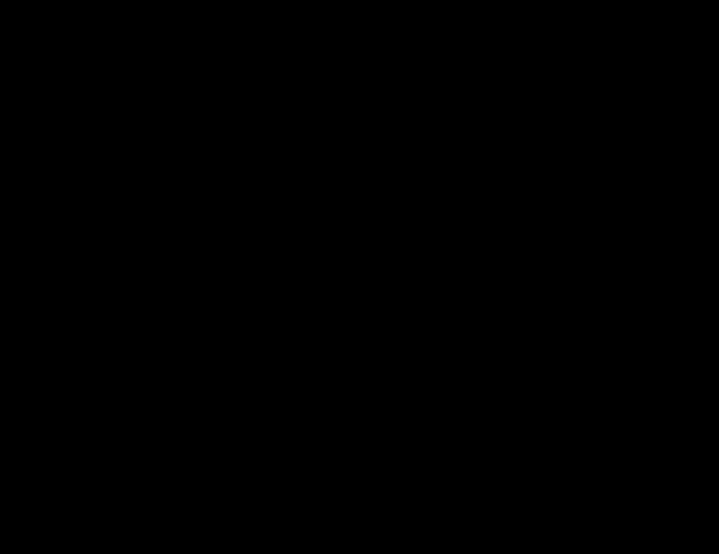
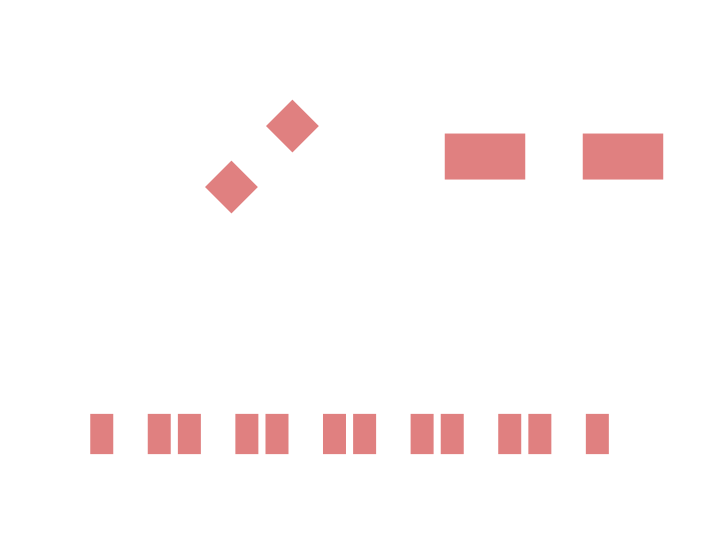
part: none -> (261, 156)
part: none -> (553, 156)
part: none -> (130, 433)
part: none -> (218, 433)
part: none -> (305, 433)
part: none -> (393, 433)
part: none -> (480, 433)
part: none -> (568, 433)

